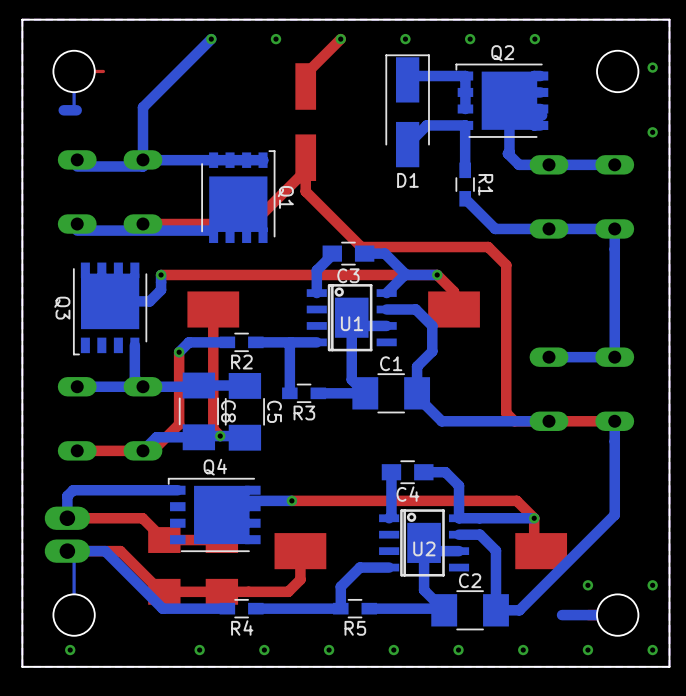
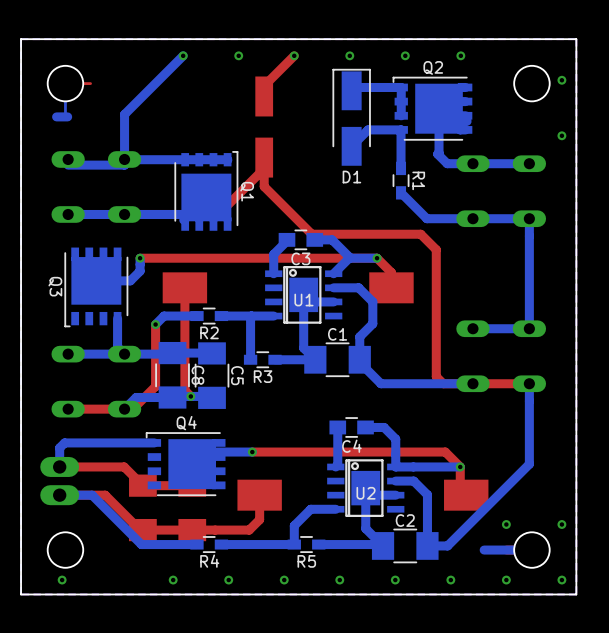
bottom track: none -> (189, 214) (68, 214)
bottom track: (211, 230) (77, 230) -> none
bottom track: (74, 560) (74, 615) -> none

